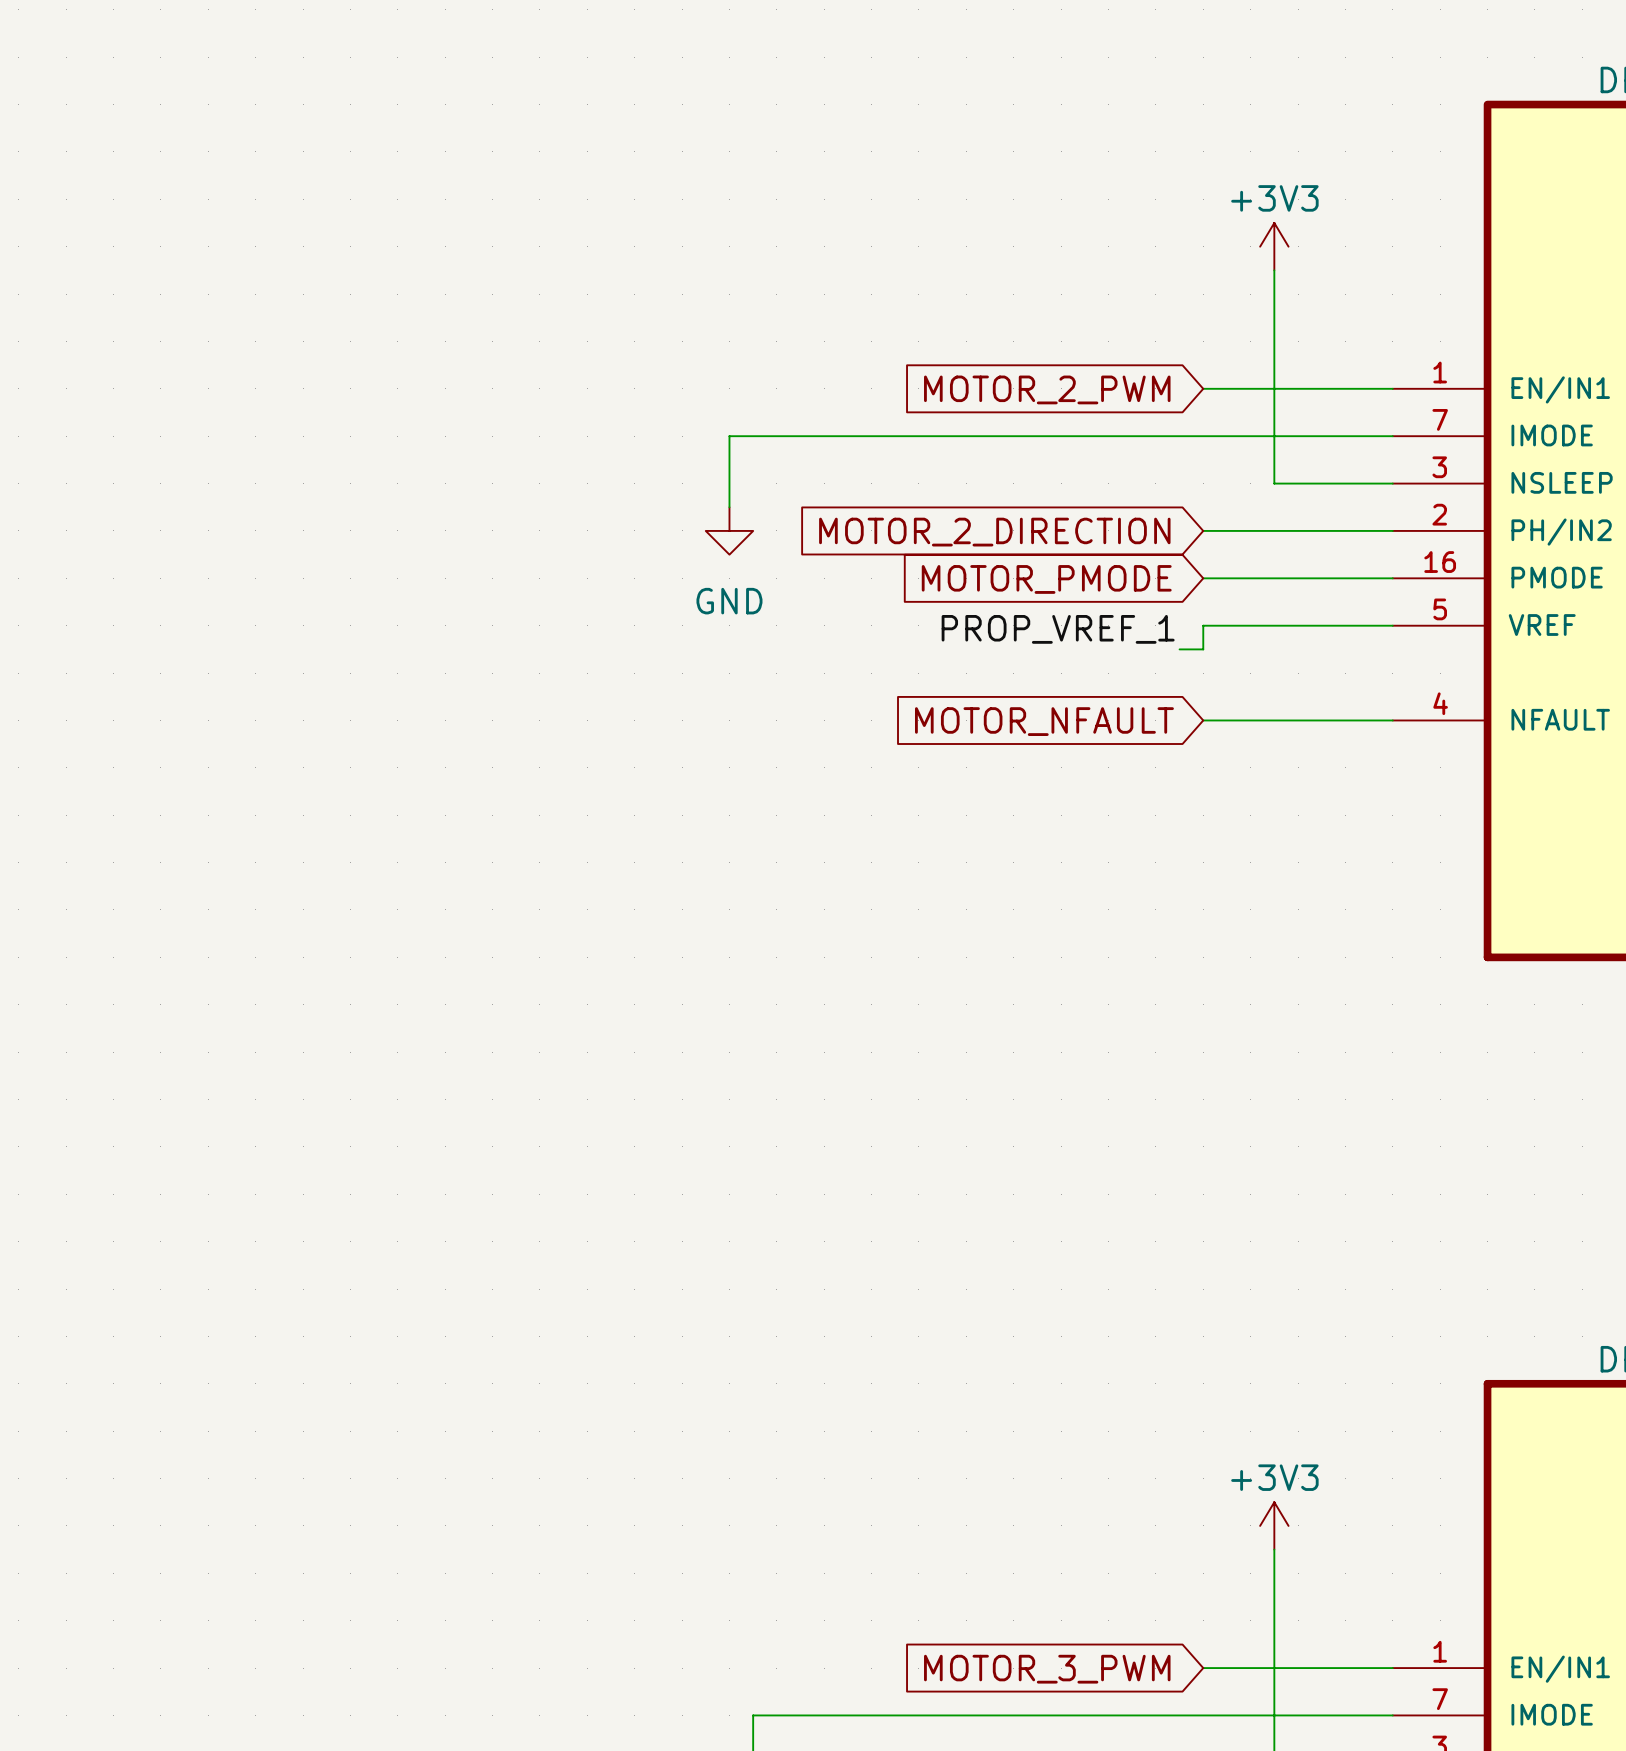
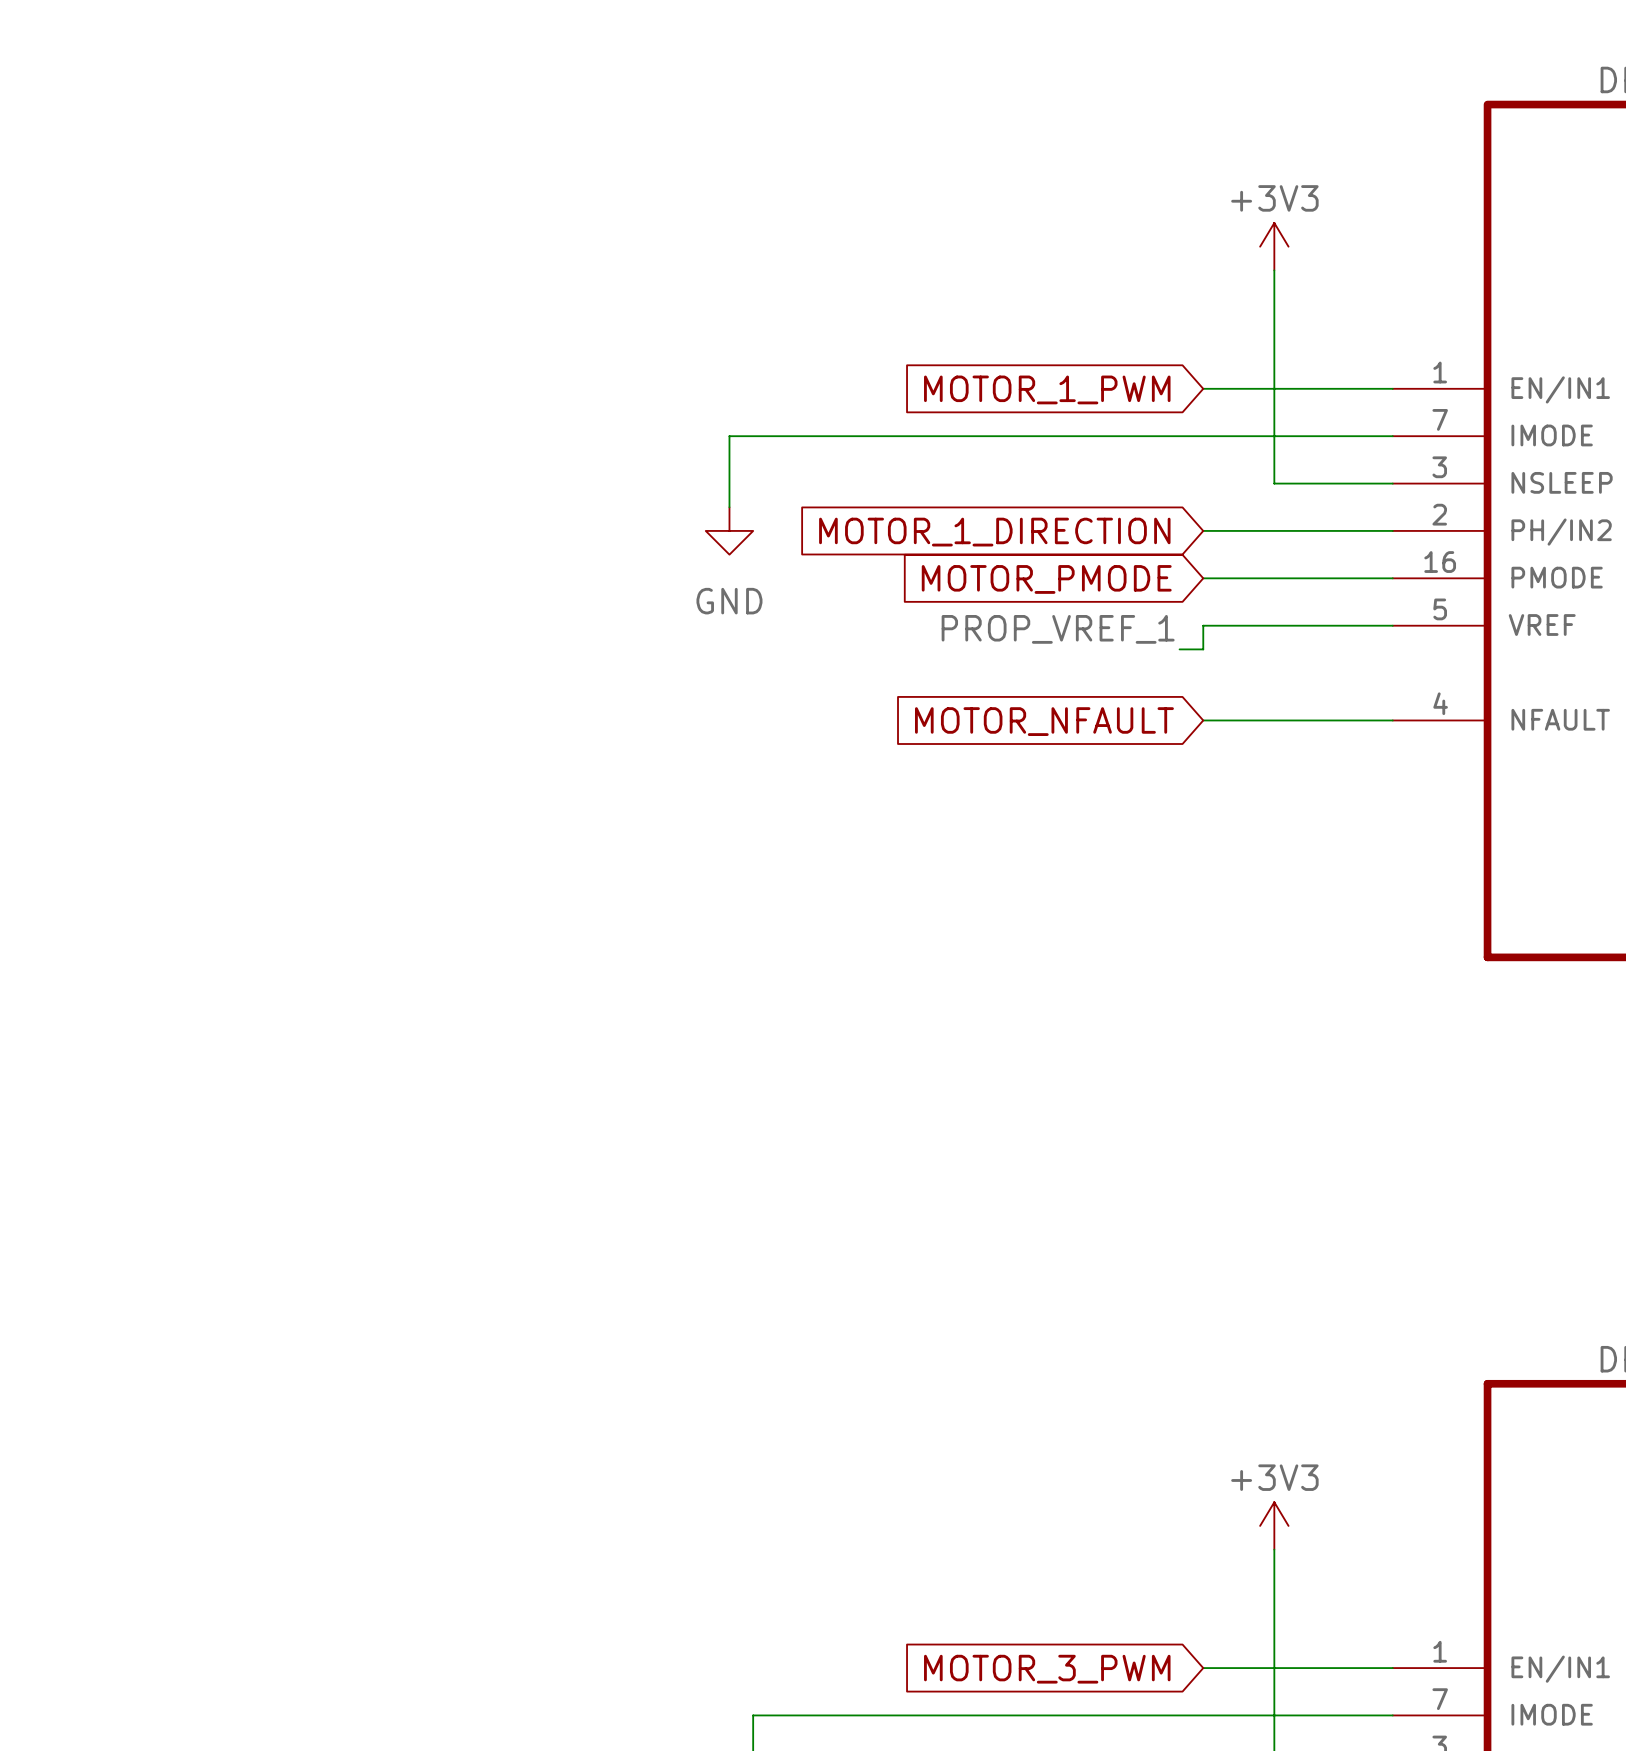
global label: MOTOR_2_PWM (1047, 389) -> MOTOR_1_PWM (1047, 389)
global label: MOTOR_2_DIRECTION (994, 532) -> MOTOR_1_DIRECTION (994, 532)

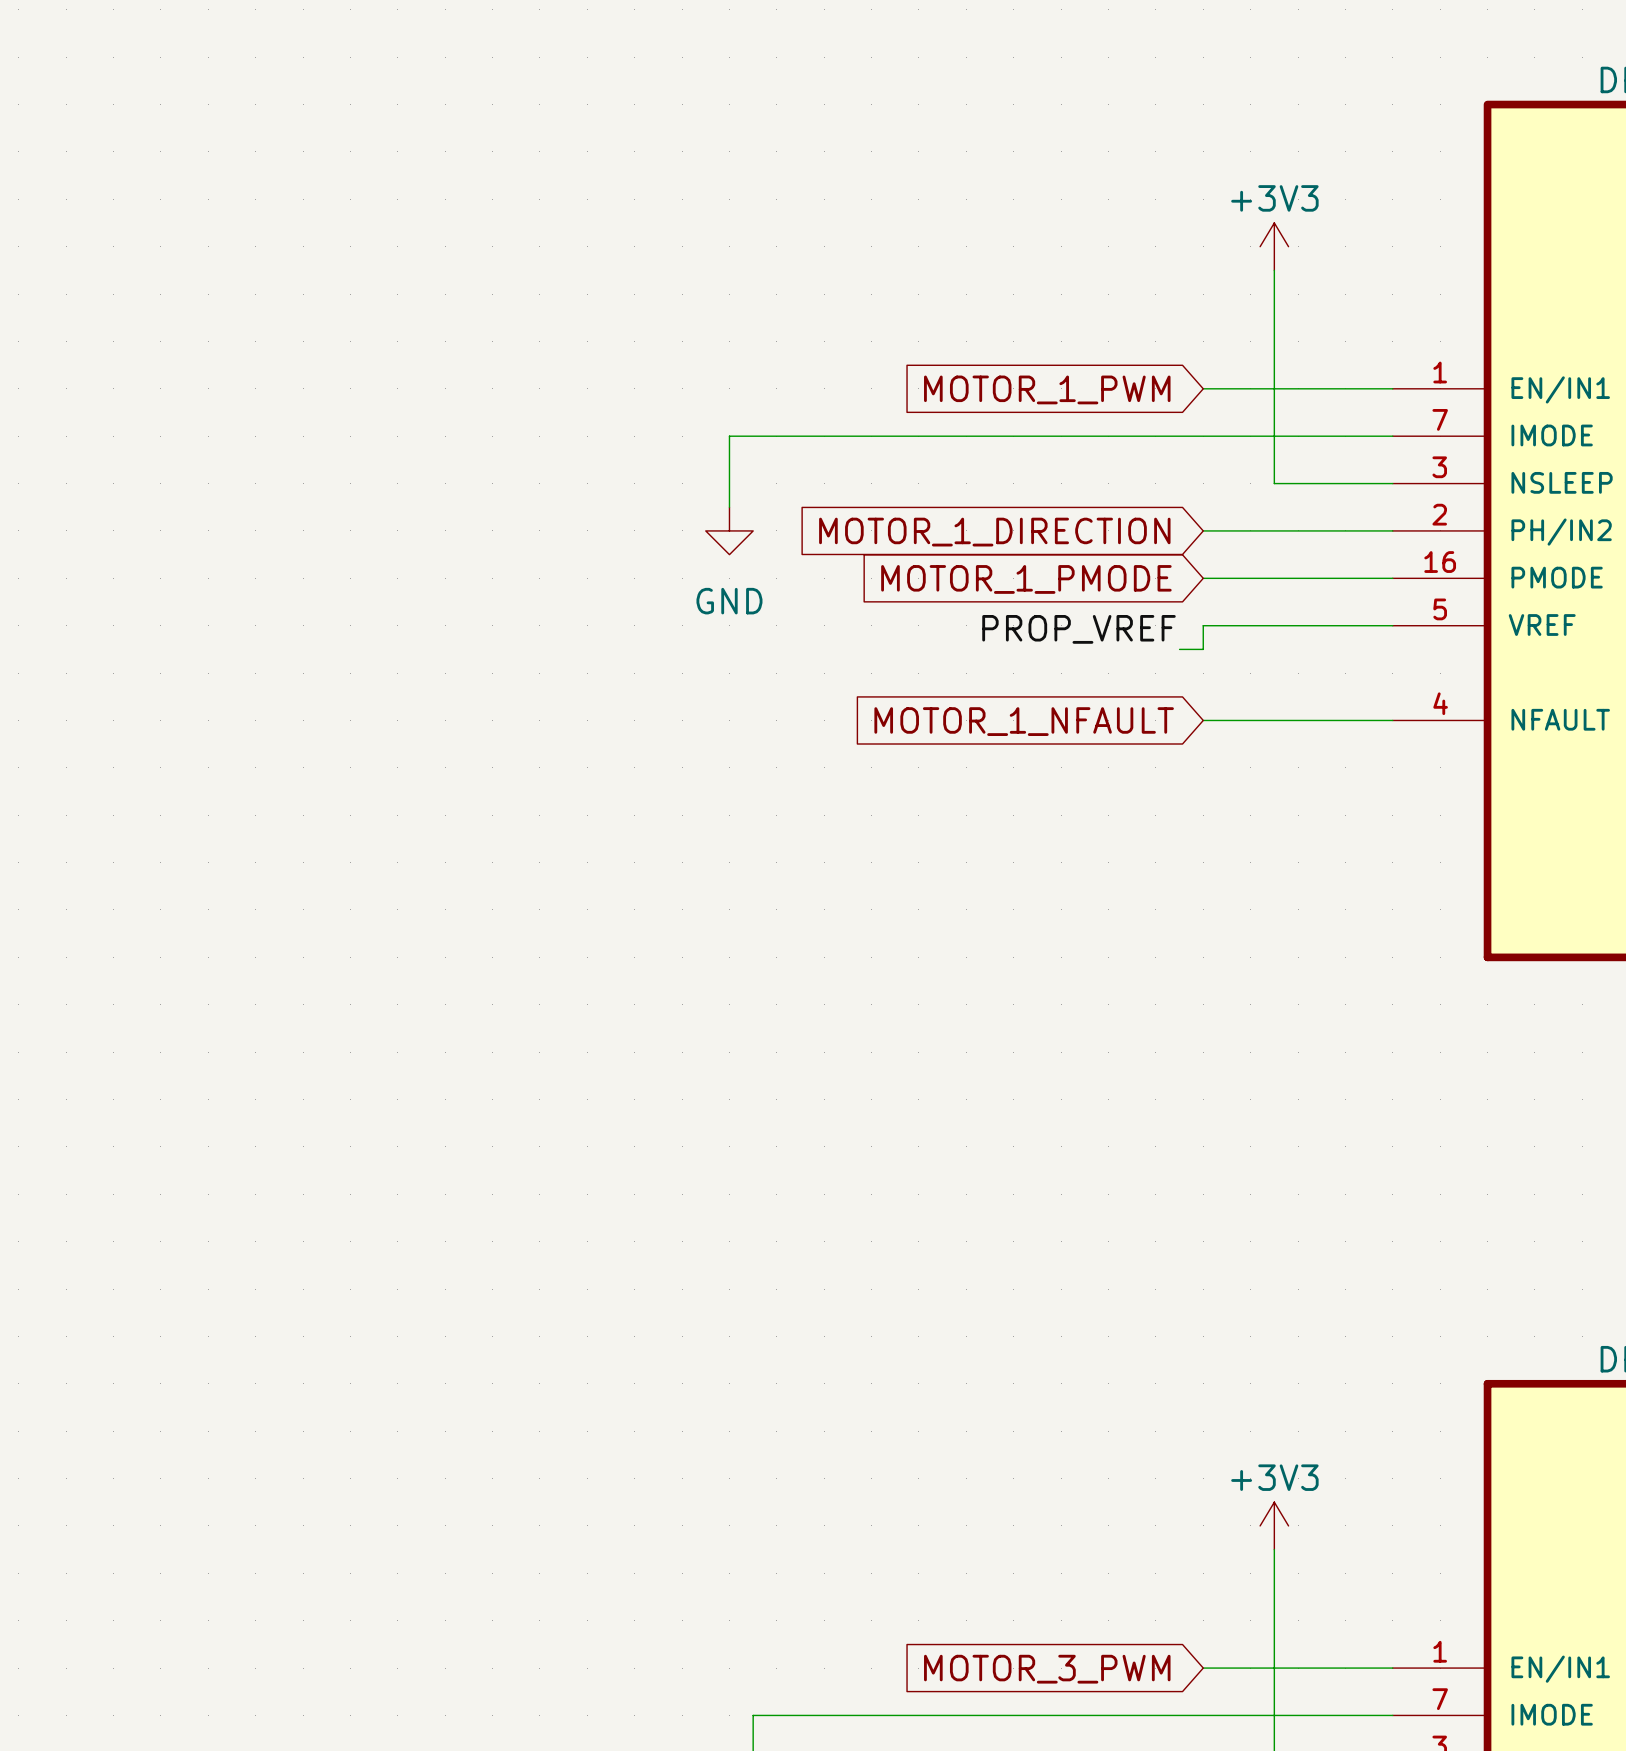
global label: MOTOR_PMODE (1046, 579) -> MOTOR_1_PMODE (1026, 579)
label: PROP_VREF_1 (1058, 629) -> PROP_VREF (1079, 629)
global label: MOTOR_NFAULT (1044, 721) -> MOTOR_1_NFAULT (1024, 721)

